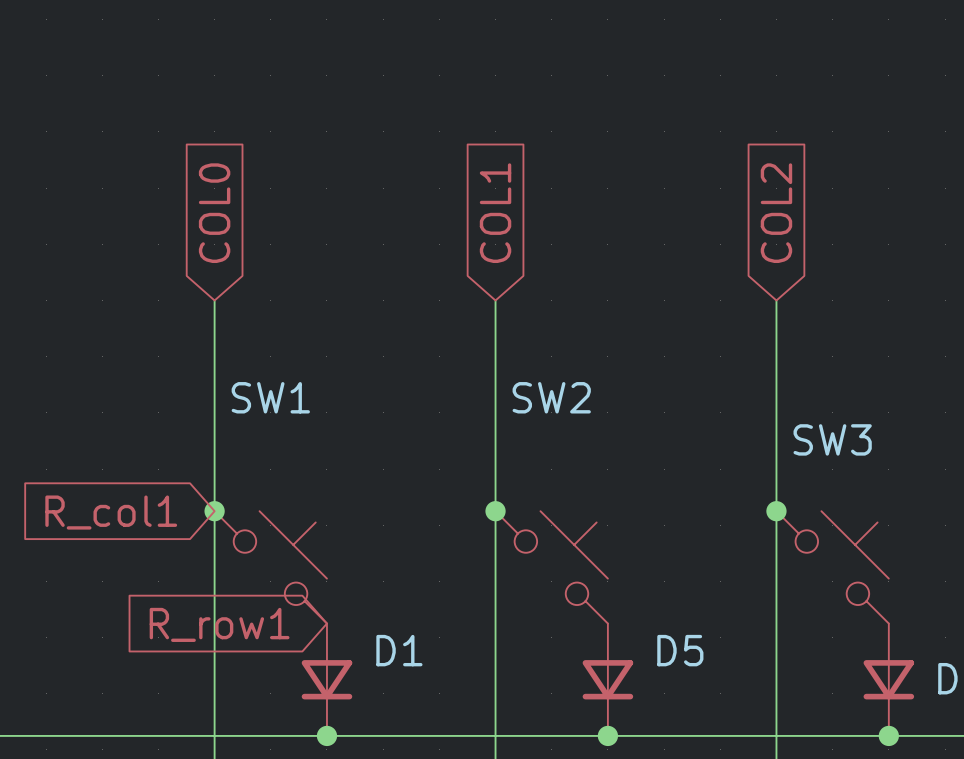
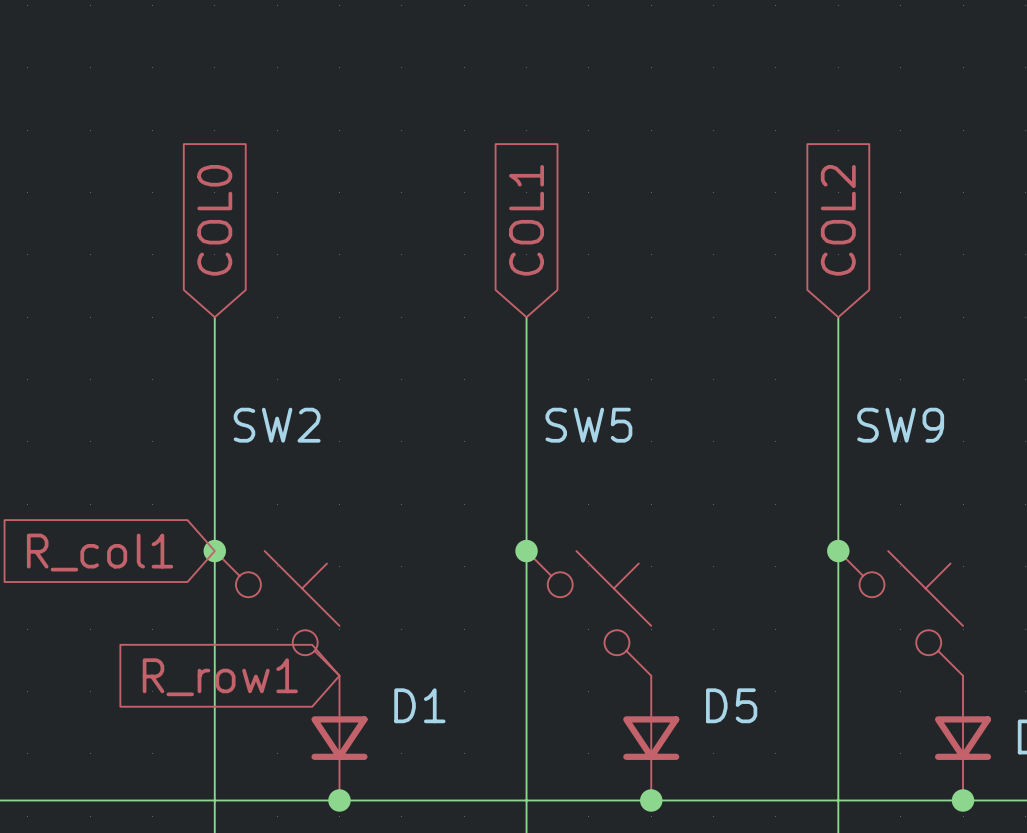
SW1 name: SW1 (270, 397) -> SW2 (277, 425)
SW2 name: SW2 (551, 397) -> SW5 (588, 425)
SW3 name: SW3 (832, 439) -> SW9 (900, 425)

